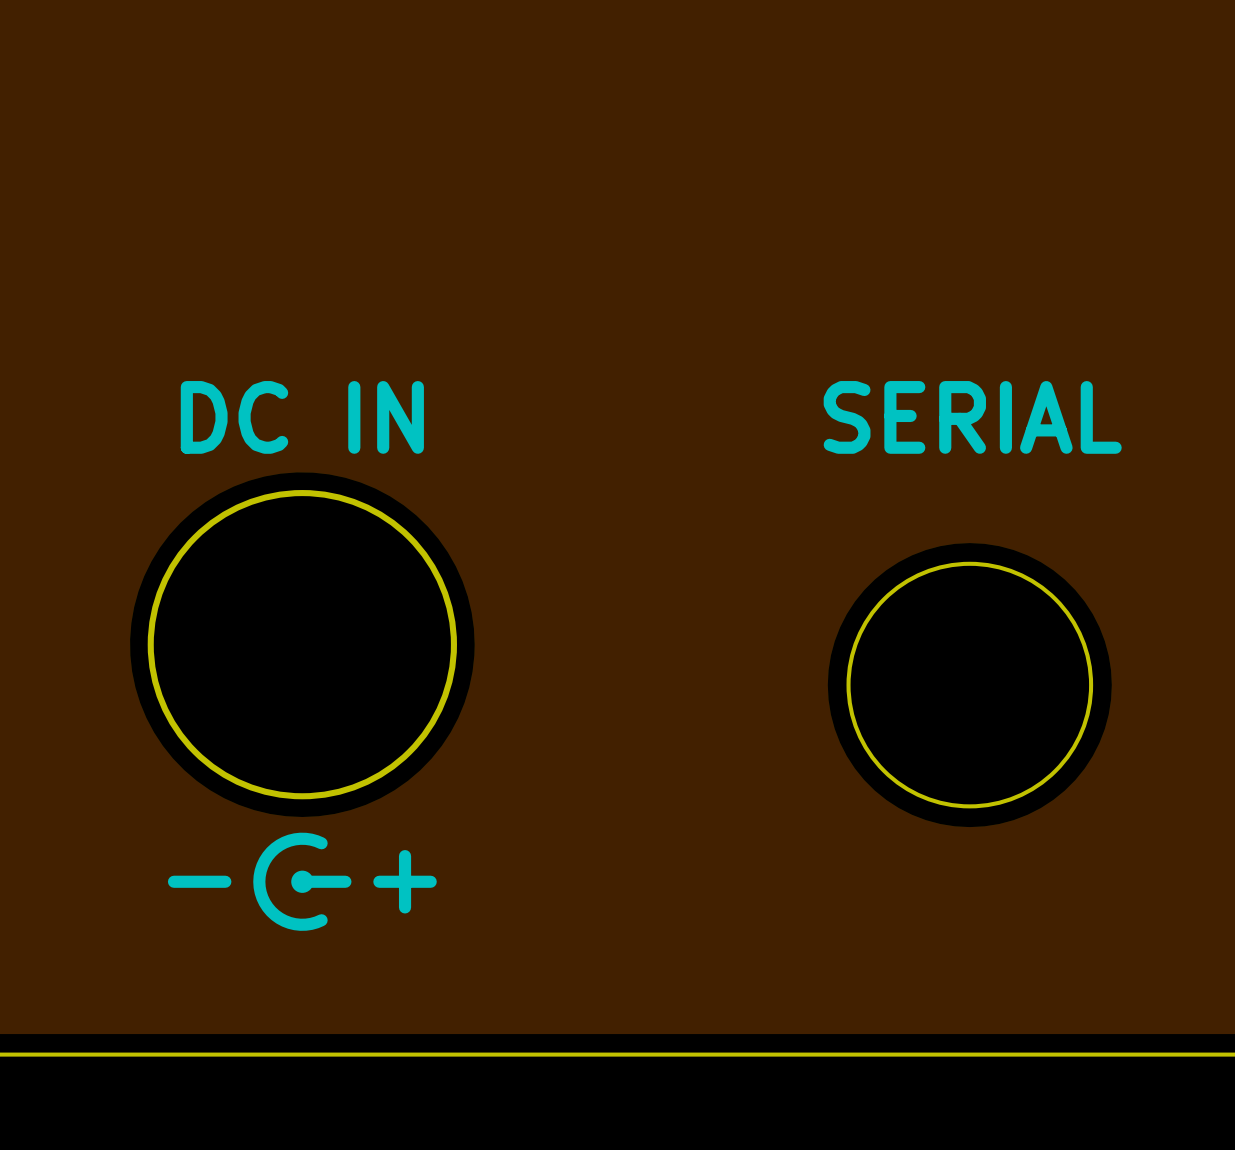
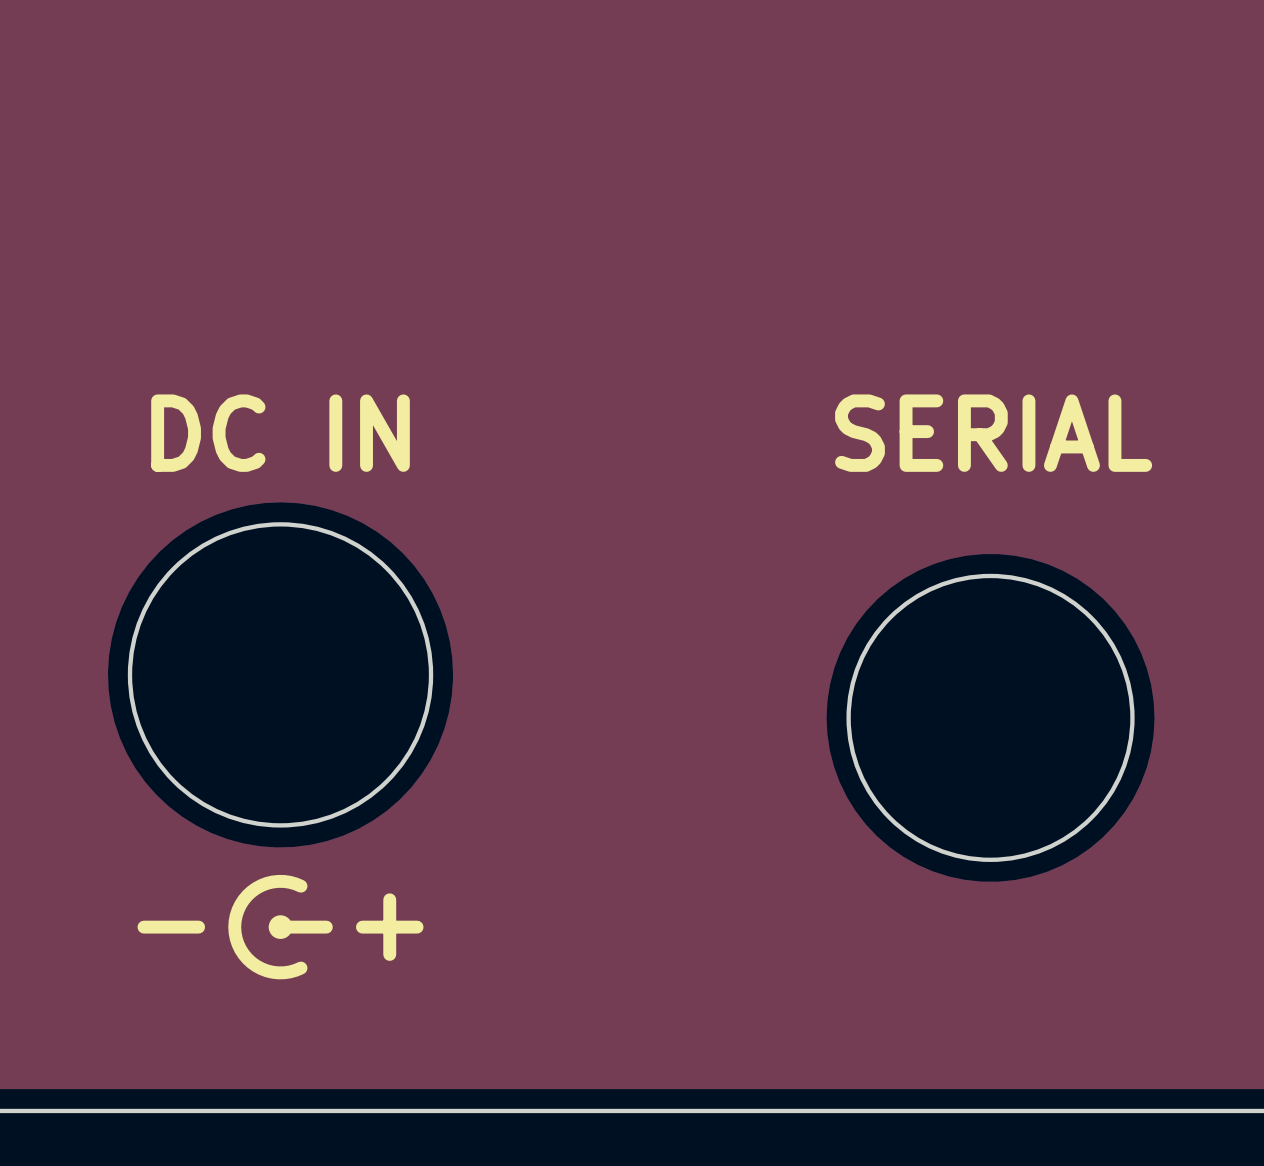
round board edge size: [147, 490, 457, 800] -> [127, 522, 434, 828]
round board edge size: [846, 561, 1094, 809] -> [846, 573, 1135, 862]

